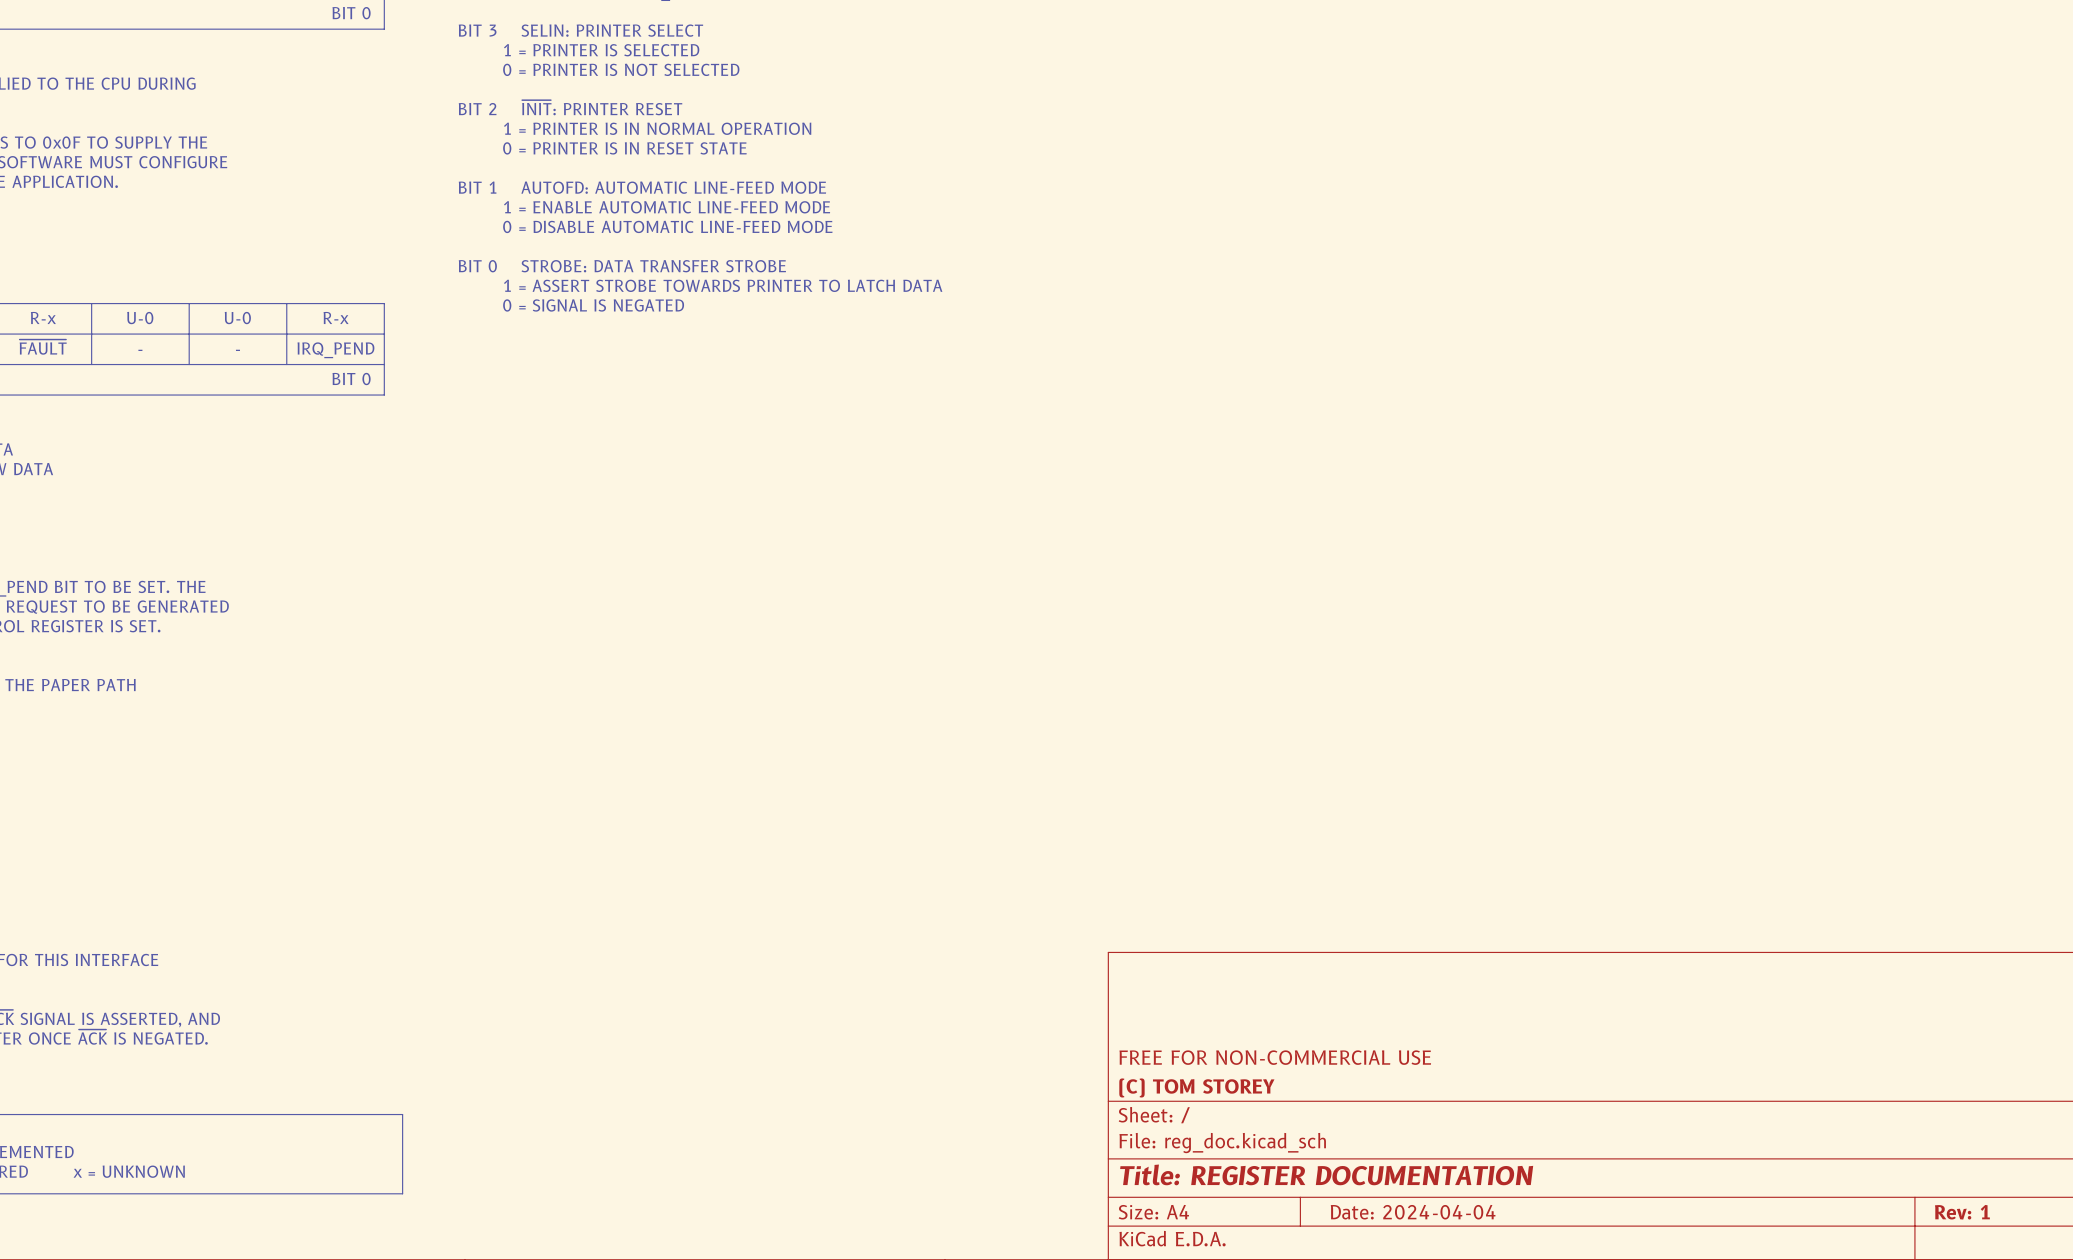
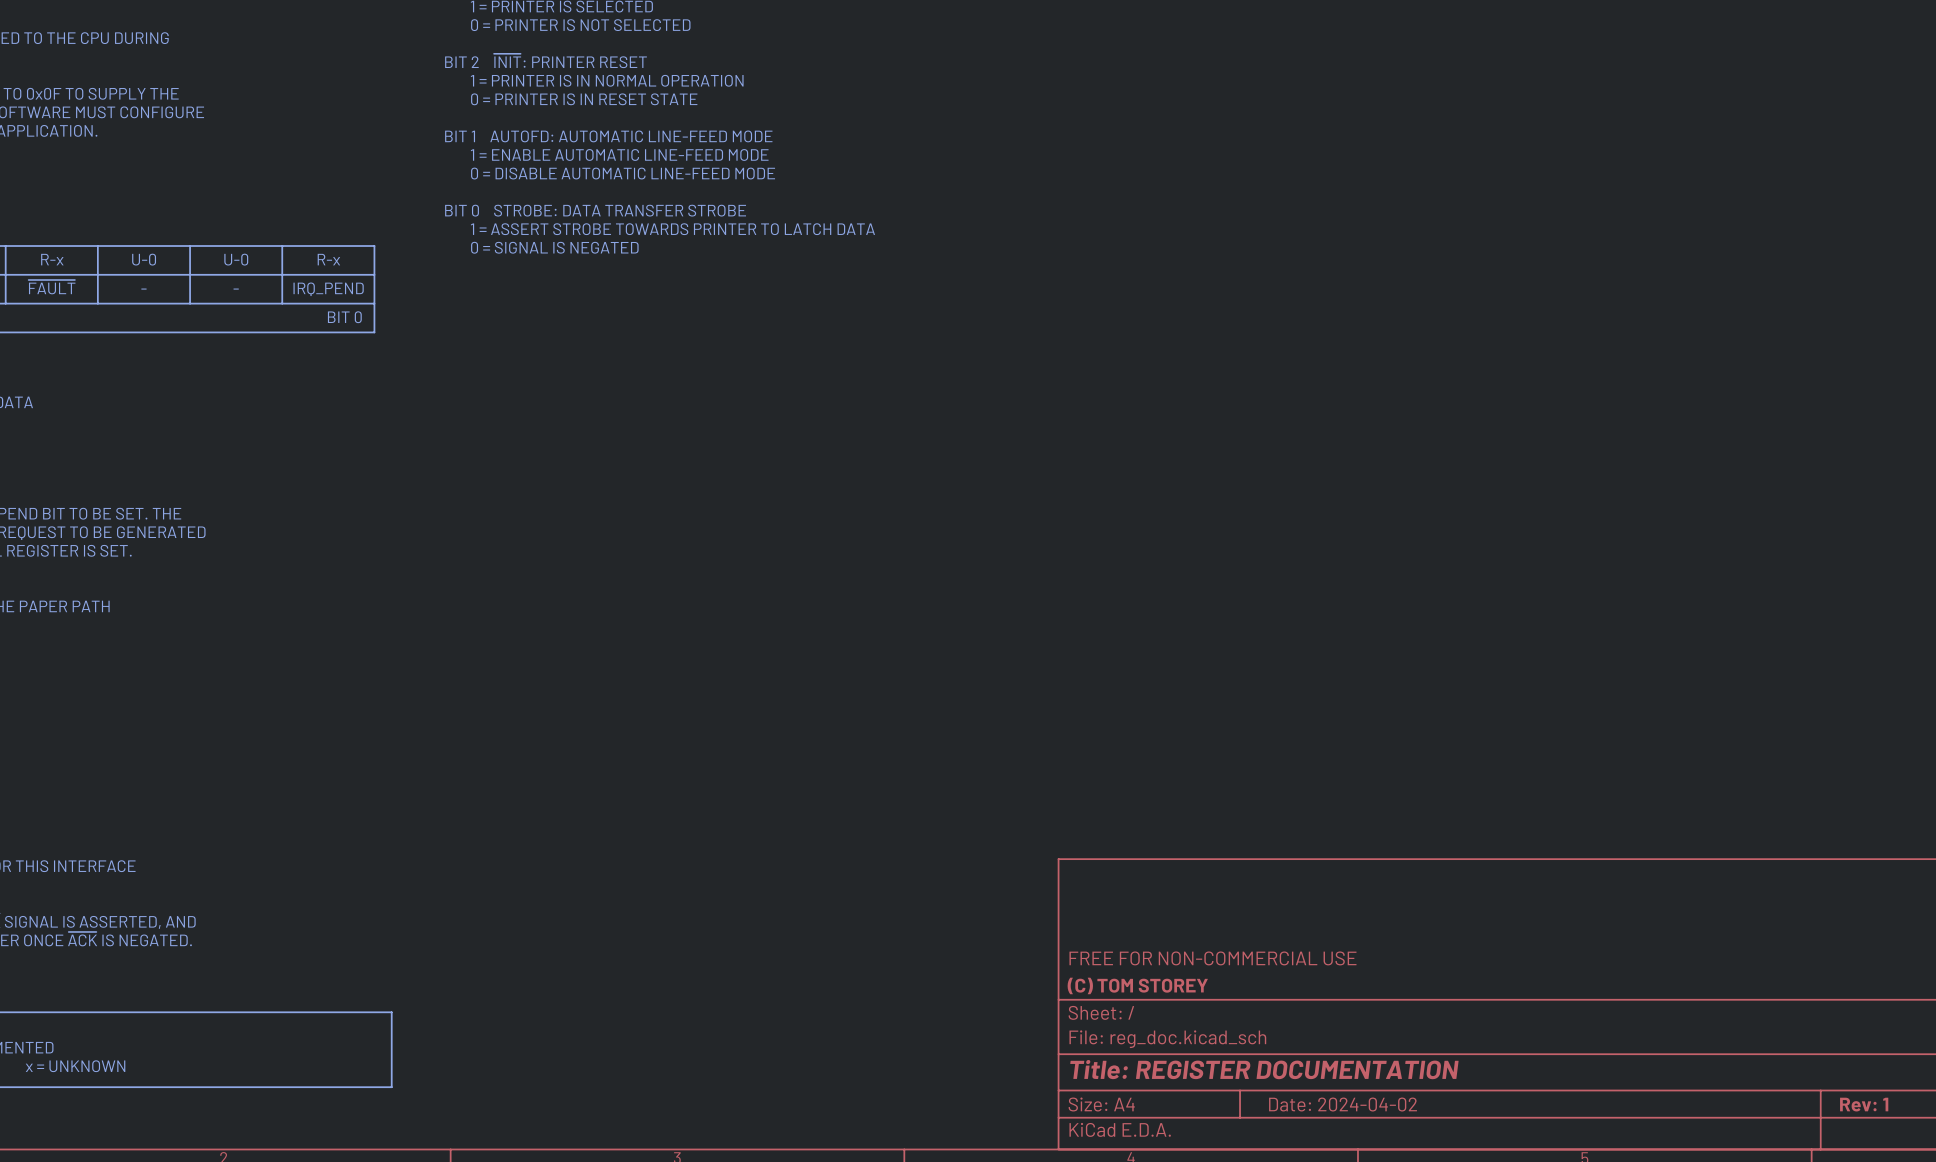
title block: Date: 2024-04-04 (1413, 1212) -> Date: 2024-04-02 (1343, 1104)

